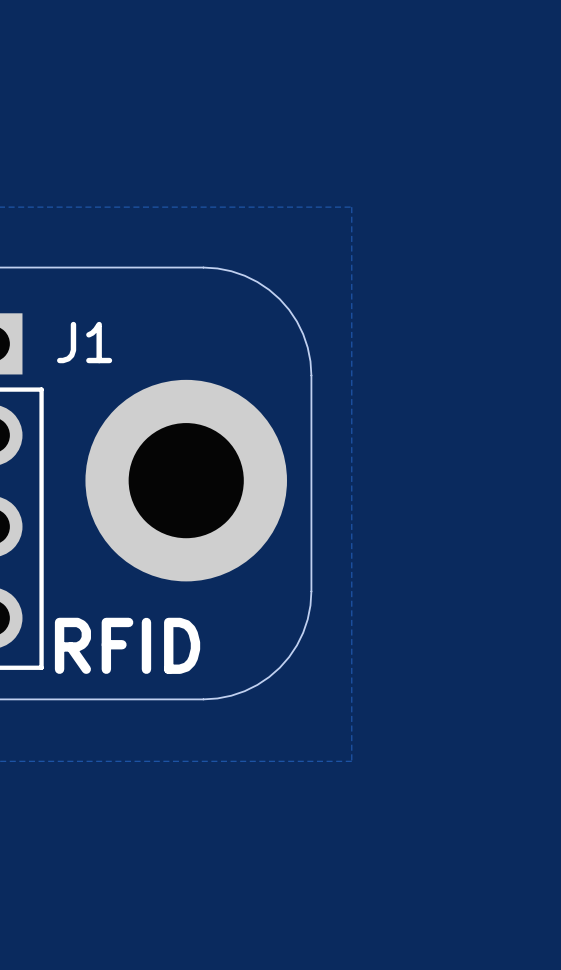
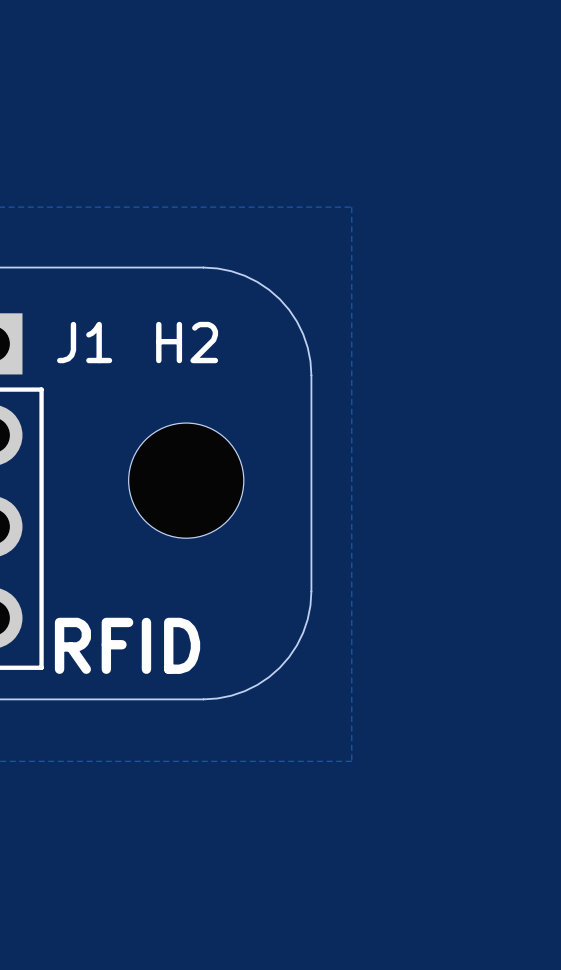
part: (186, 480) -> none
H2: none -> (186, 480)

